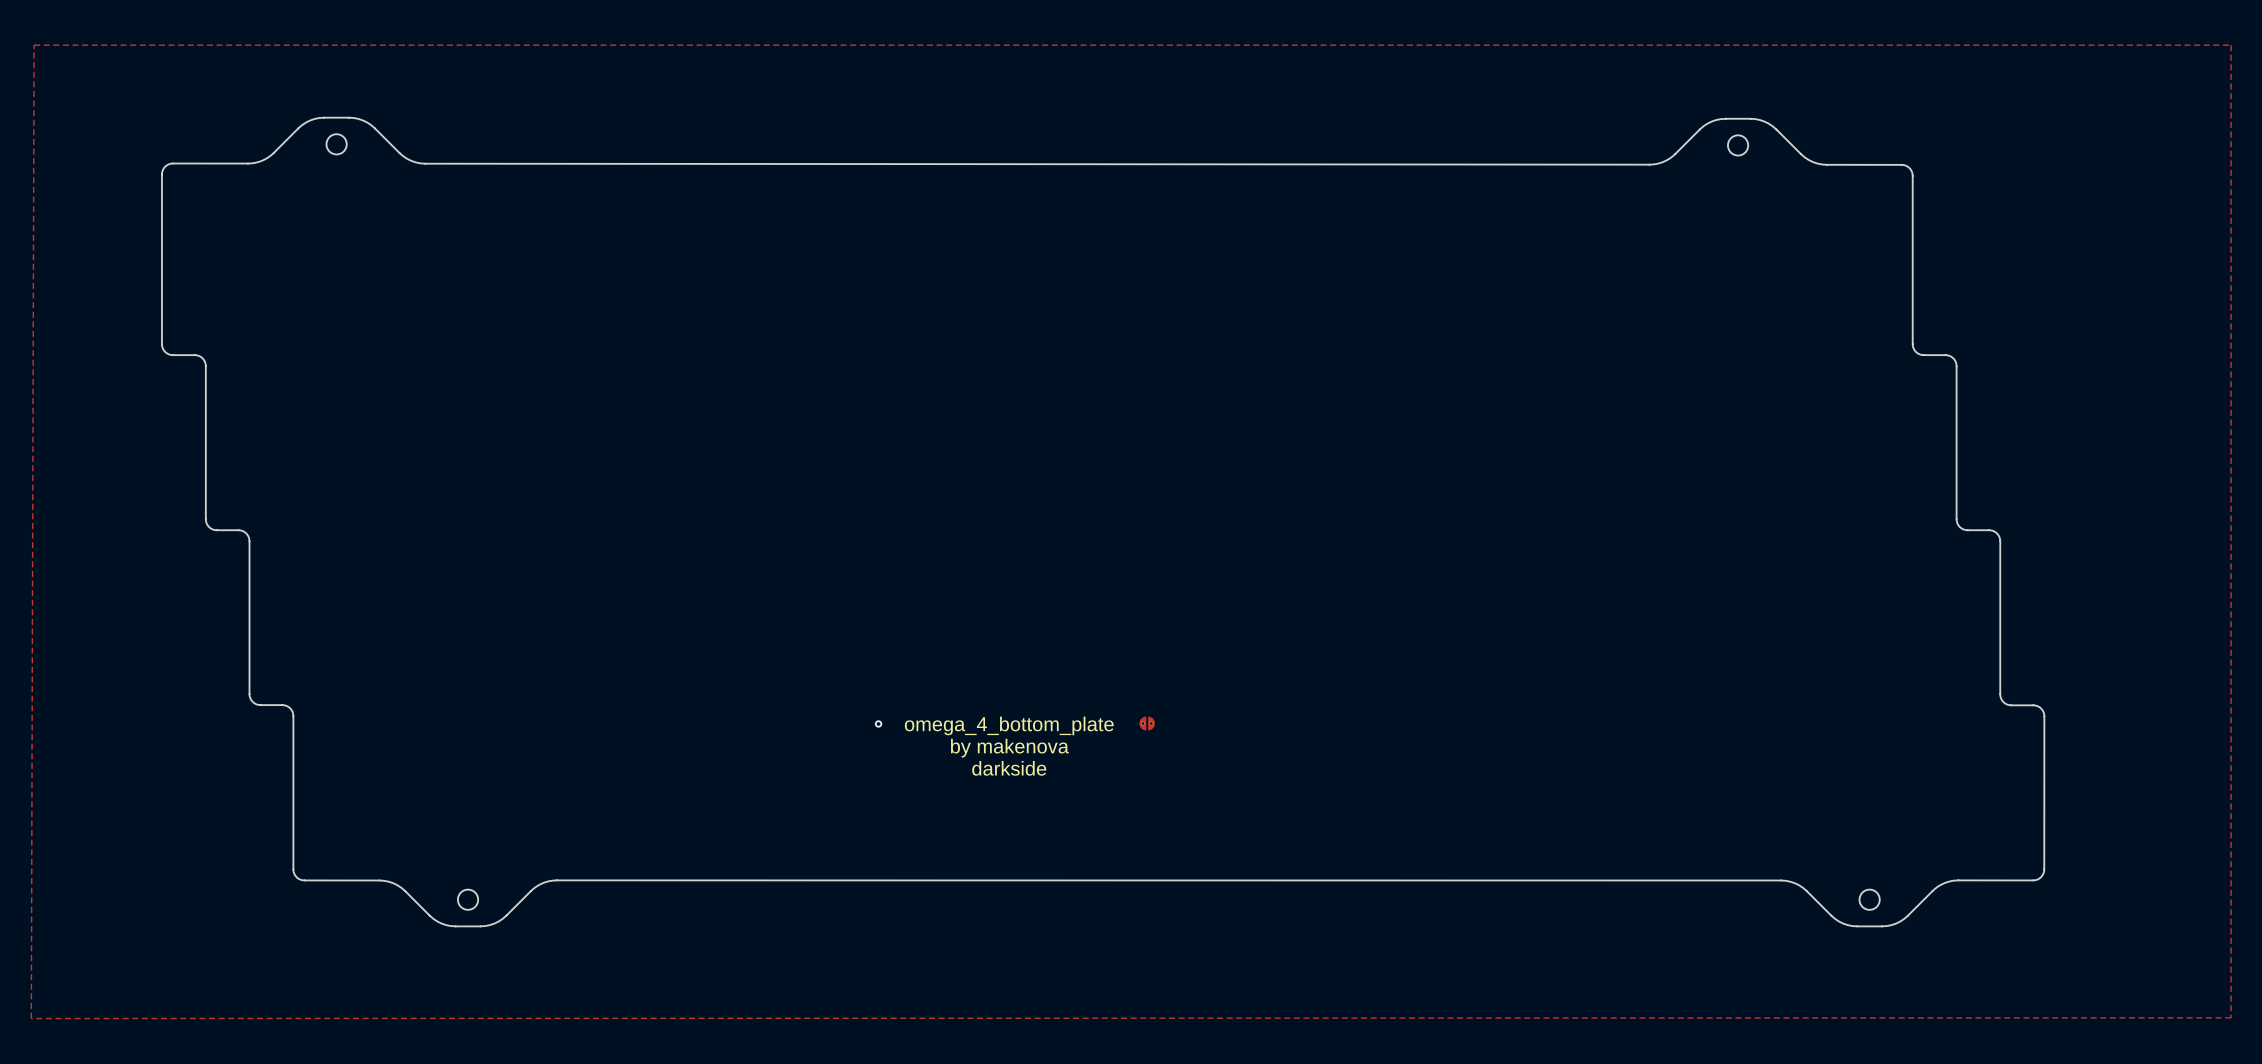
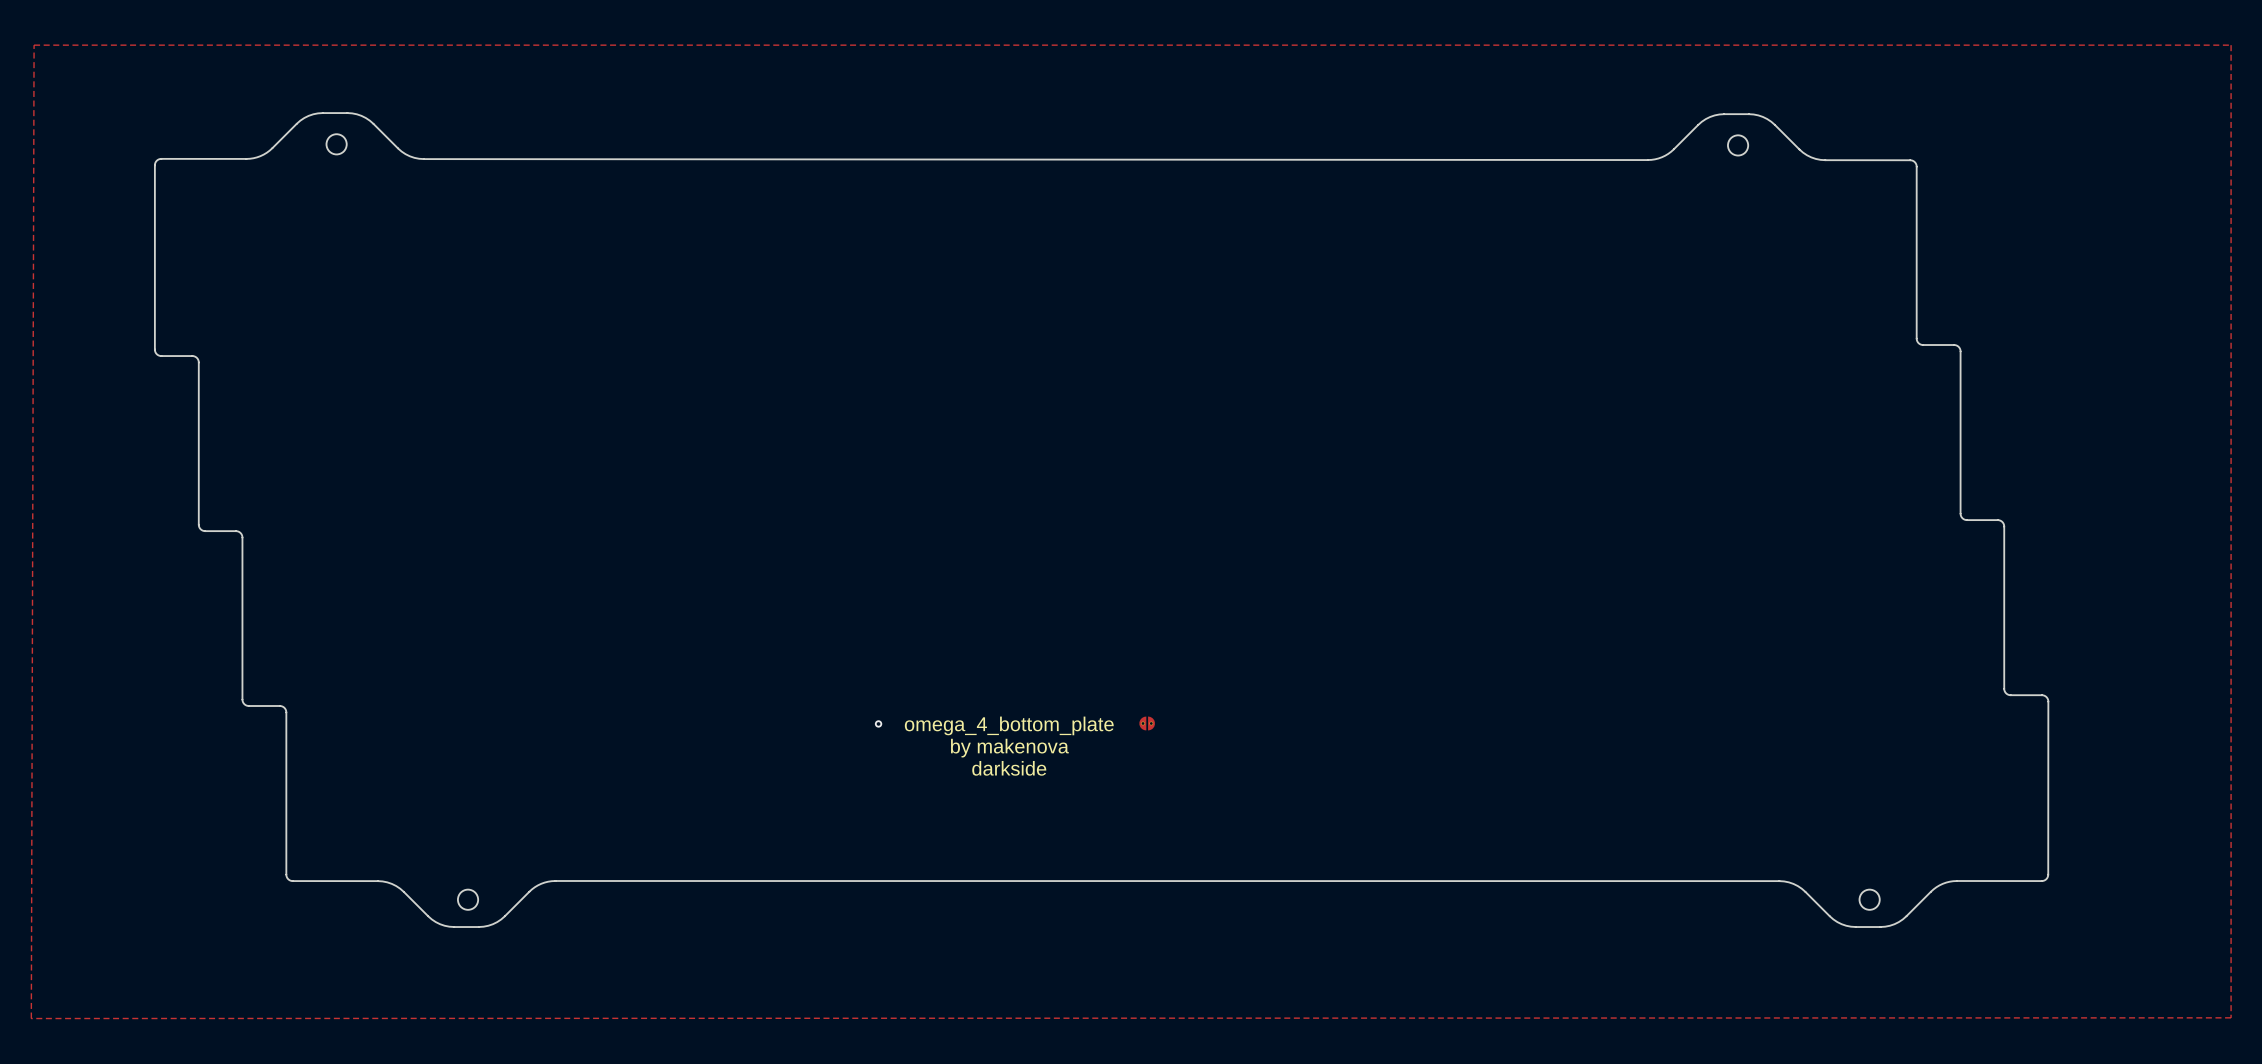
board edge: (260, 705) (253, 702) (249, 695) (249, 538) (241, 530) (212, 529) (205, 520) (205, 363) (197, 355) (168, 354) (162, 345) (161, 174) (163, 168) (169, 164) (258, 161) (271, 155) (298, 128) (310, 120) (319, 117) (348, 117) (367, 122) (403, 156) (415, 162) (425, 163) (1649, 164) (1660, 163) (1669, 158) (1699, 129) (1711, 121) (1725, 118) (1755, 119) (1772, 126) (1804, 157) (1817, 163) (1903, 164) (1911, 171) (1912, 345) (1919, 354) (1948, 355) (1956, 363) (1956, 520) (1963, 529) (1992, 530) (1999, 538) (2001, 698) (2008, 704) (2036, 705) (2044, 713) (2044, 870) (2041, 877) (2034, 880) (1947, 881) (1935, 888) (1904, 918) (1896, 923) (1882, 926) (1852, 926) (1843, 923) (1831, 915) (1803, 888) (1790, 881) (1780, 880) (556, 880) (546, 881) (536, 886) (506, 915) (494, 923) (480, 926) (450, 926) (433, 918) (401, 888) (388, 881) (304, 880) (295, 876) (293, 869) (293, 713) (285, 705) (260, 705) -> (322, 113) (308, 115) (300, 120) (269, 150) (257, 157) (160, 158) (156, 161) (154, 165) (154, 350) (159, 355) (193, 356) (198, 360) (198, 525) (203, 530) (236, 531) (242, 535) (242, 700) (247, 705) (280, 706) (286, 710) (286, 874) (290, 880) (387, 882) (400, 888) (435, 922) (454, 927) (483, 926) (492, 924) (504, 916) (534, 887) (544, 882) (555, 881) (1779, 881) (1788, 882) (1801, 888) (1829, 916) (1841, 924) (1850, 926) (1880, 927) (1894, 924) (1902, 919) (1933, 889) (1946, 882) (2041, 881) (2047, 877) (2048, 700) (2043, 695) (2009, 695) (2004, 690) (2004, 525) (1999, 520) (1966, 520) (1960, 515) (1960, 348) (1954, 345) (1921, 344) (1916, 340) (1916, 166) (1912, 160) (1815, 158) (1803, 152) (1771, 121) (1762, 116) (1748, 114) (1719, 114) (1710, 116) (1698, 124) (1668, 153) (1658, 158) (1647, 160) (423, 159) (414, 157) (401, 151) (373, 123) (361, 115) (352, 113) (322, 113)

